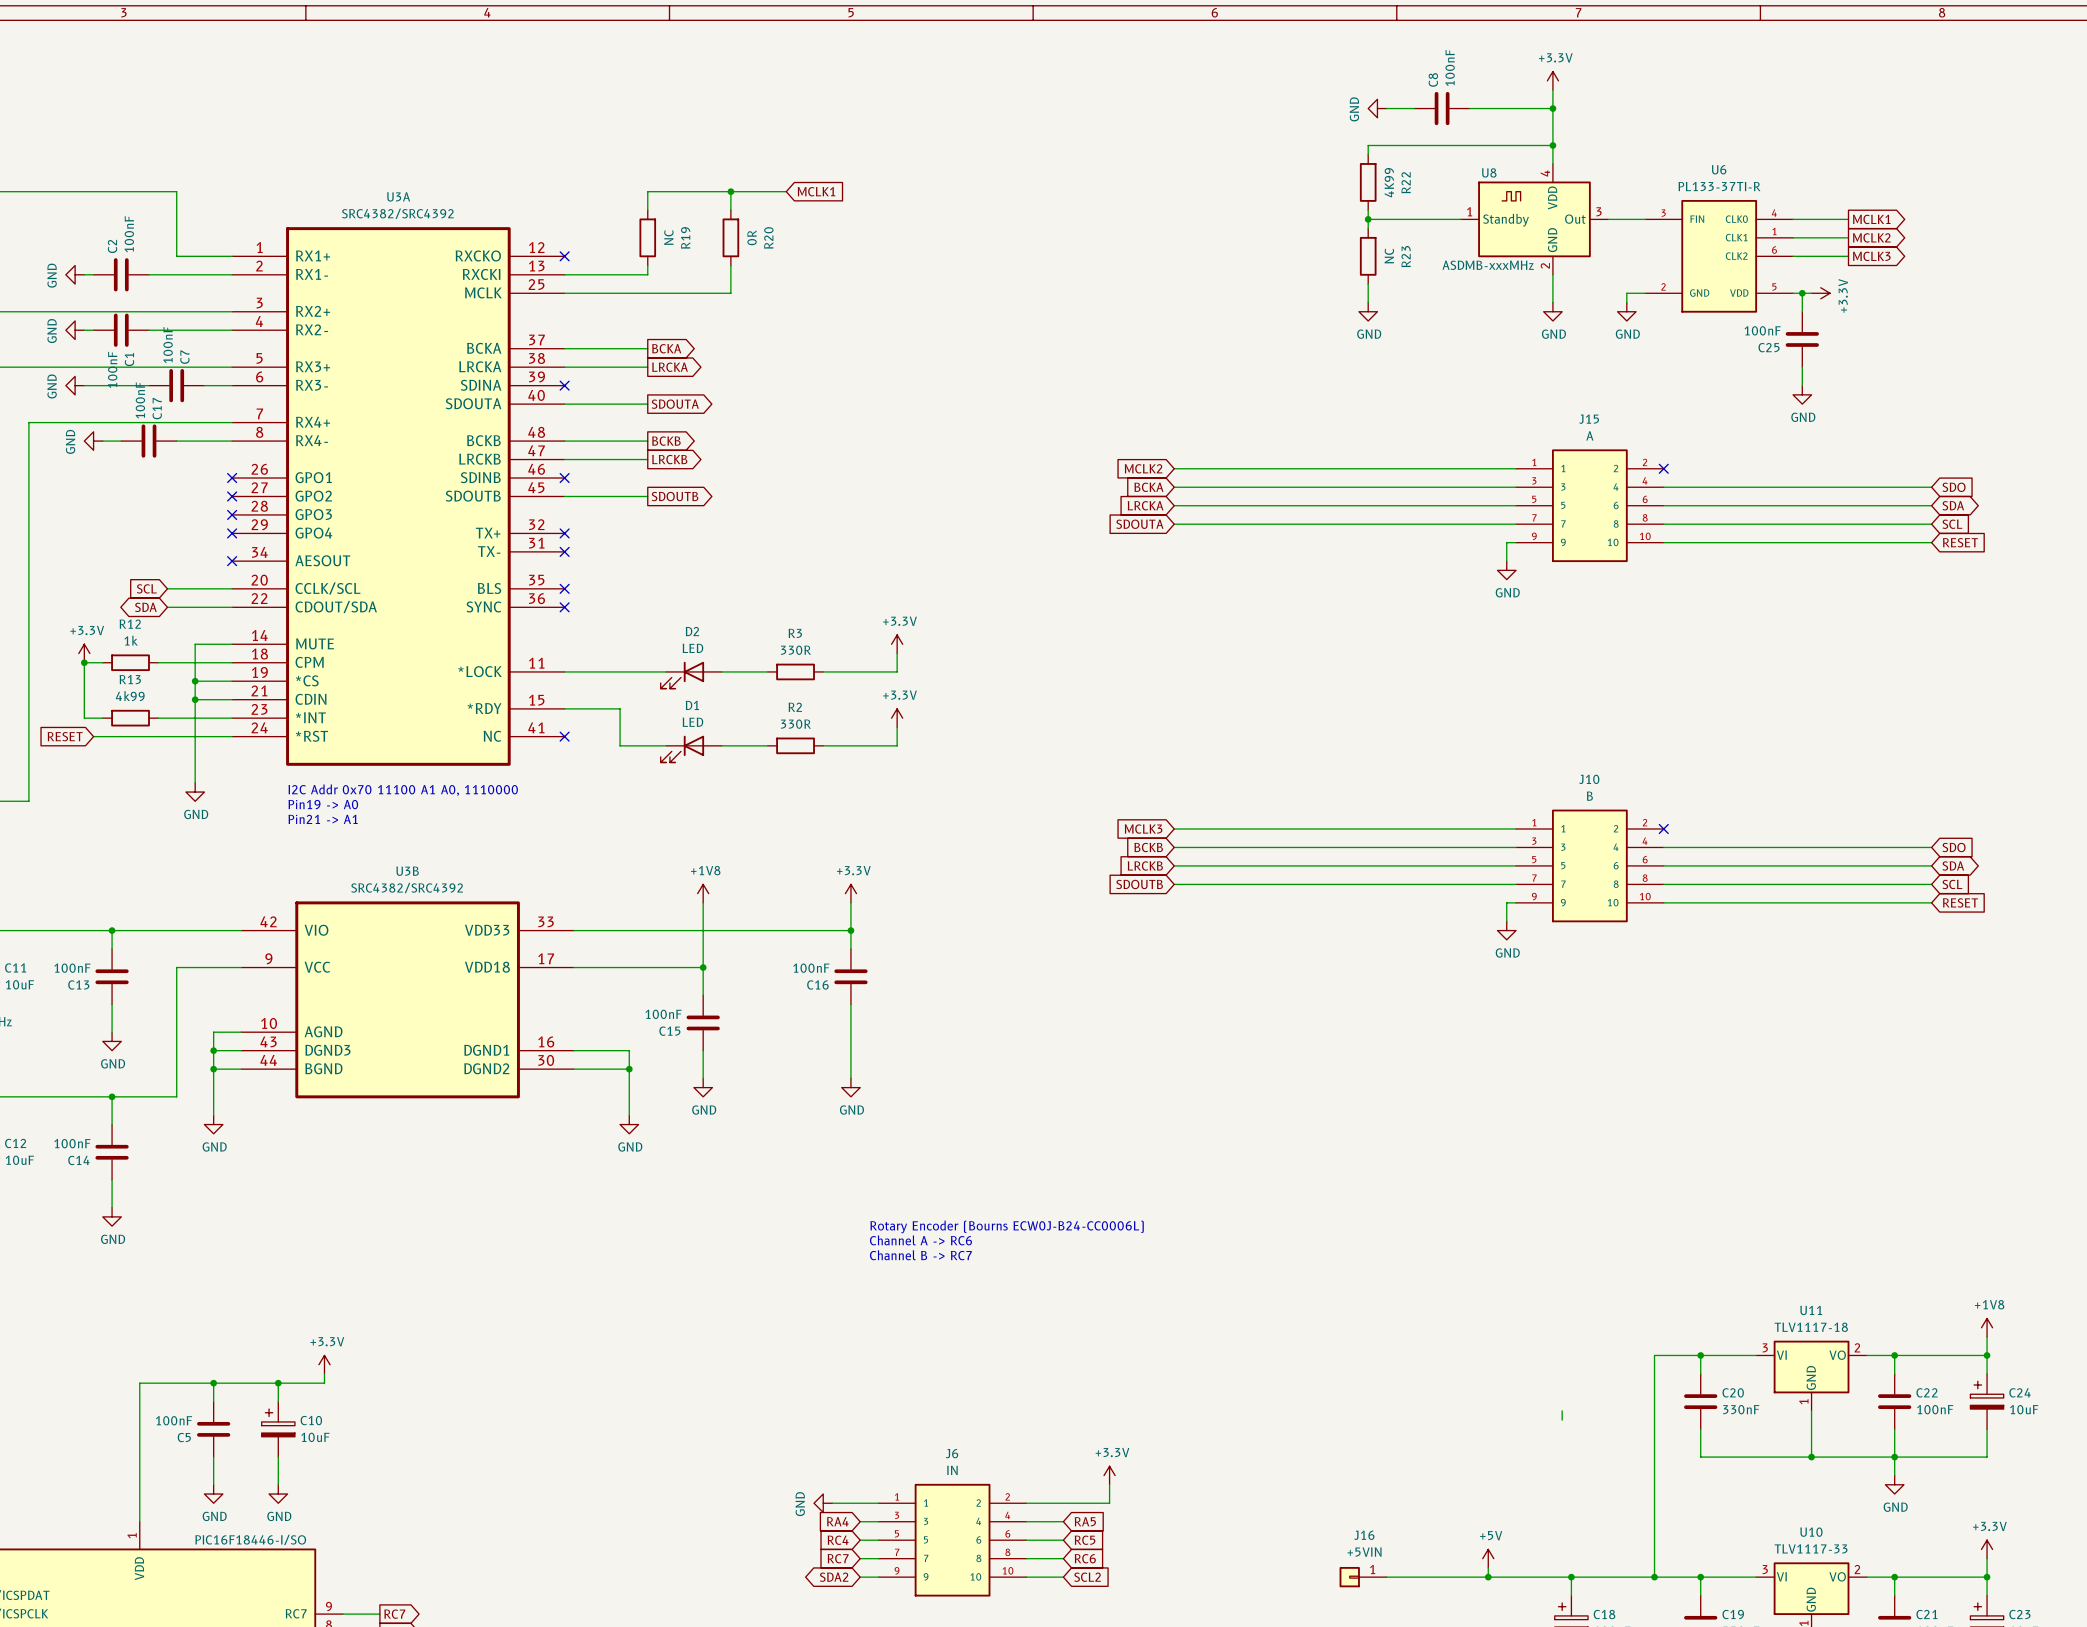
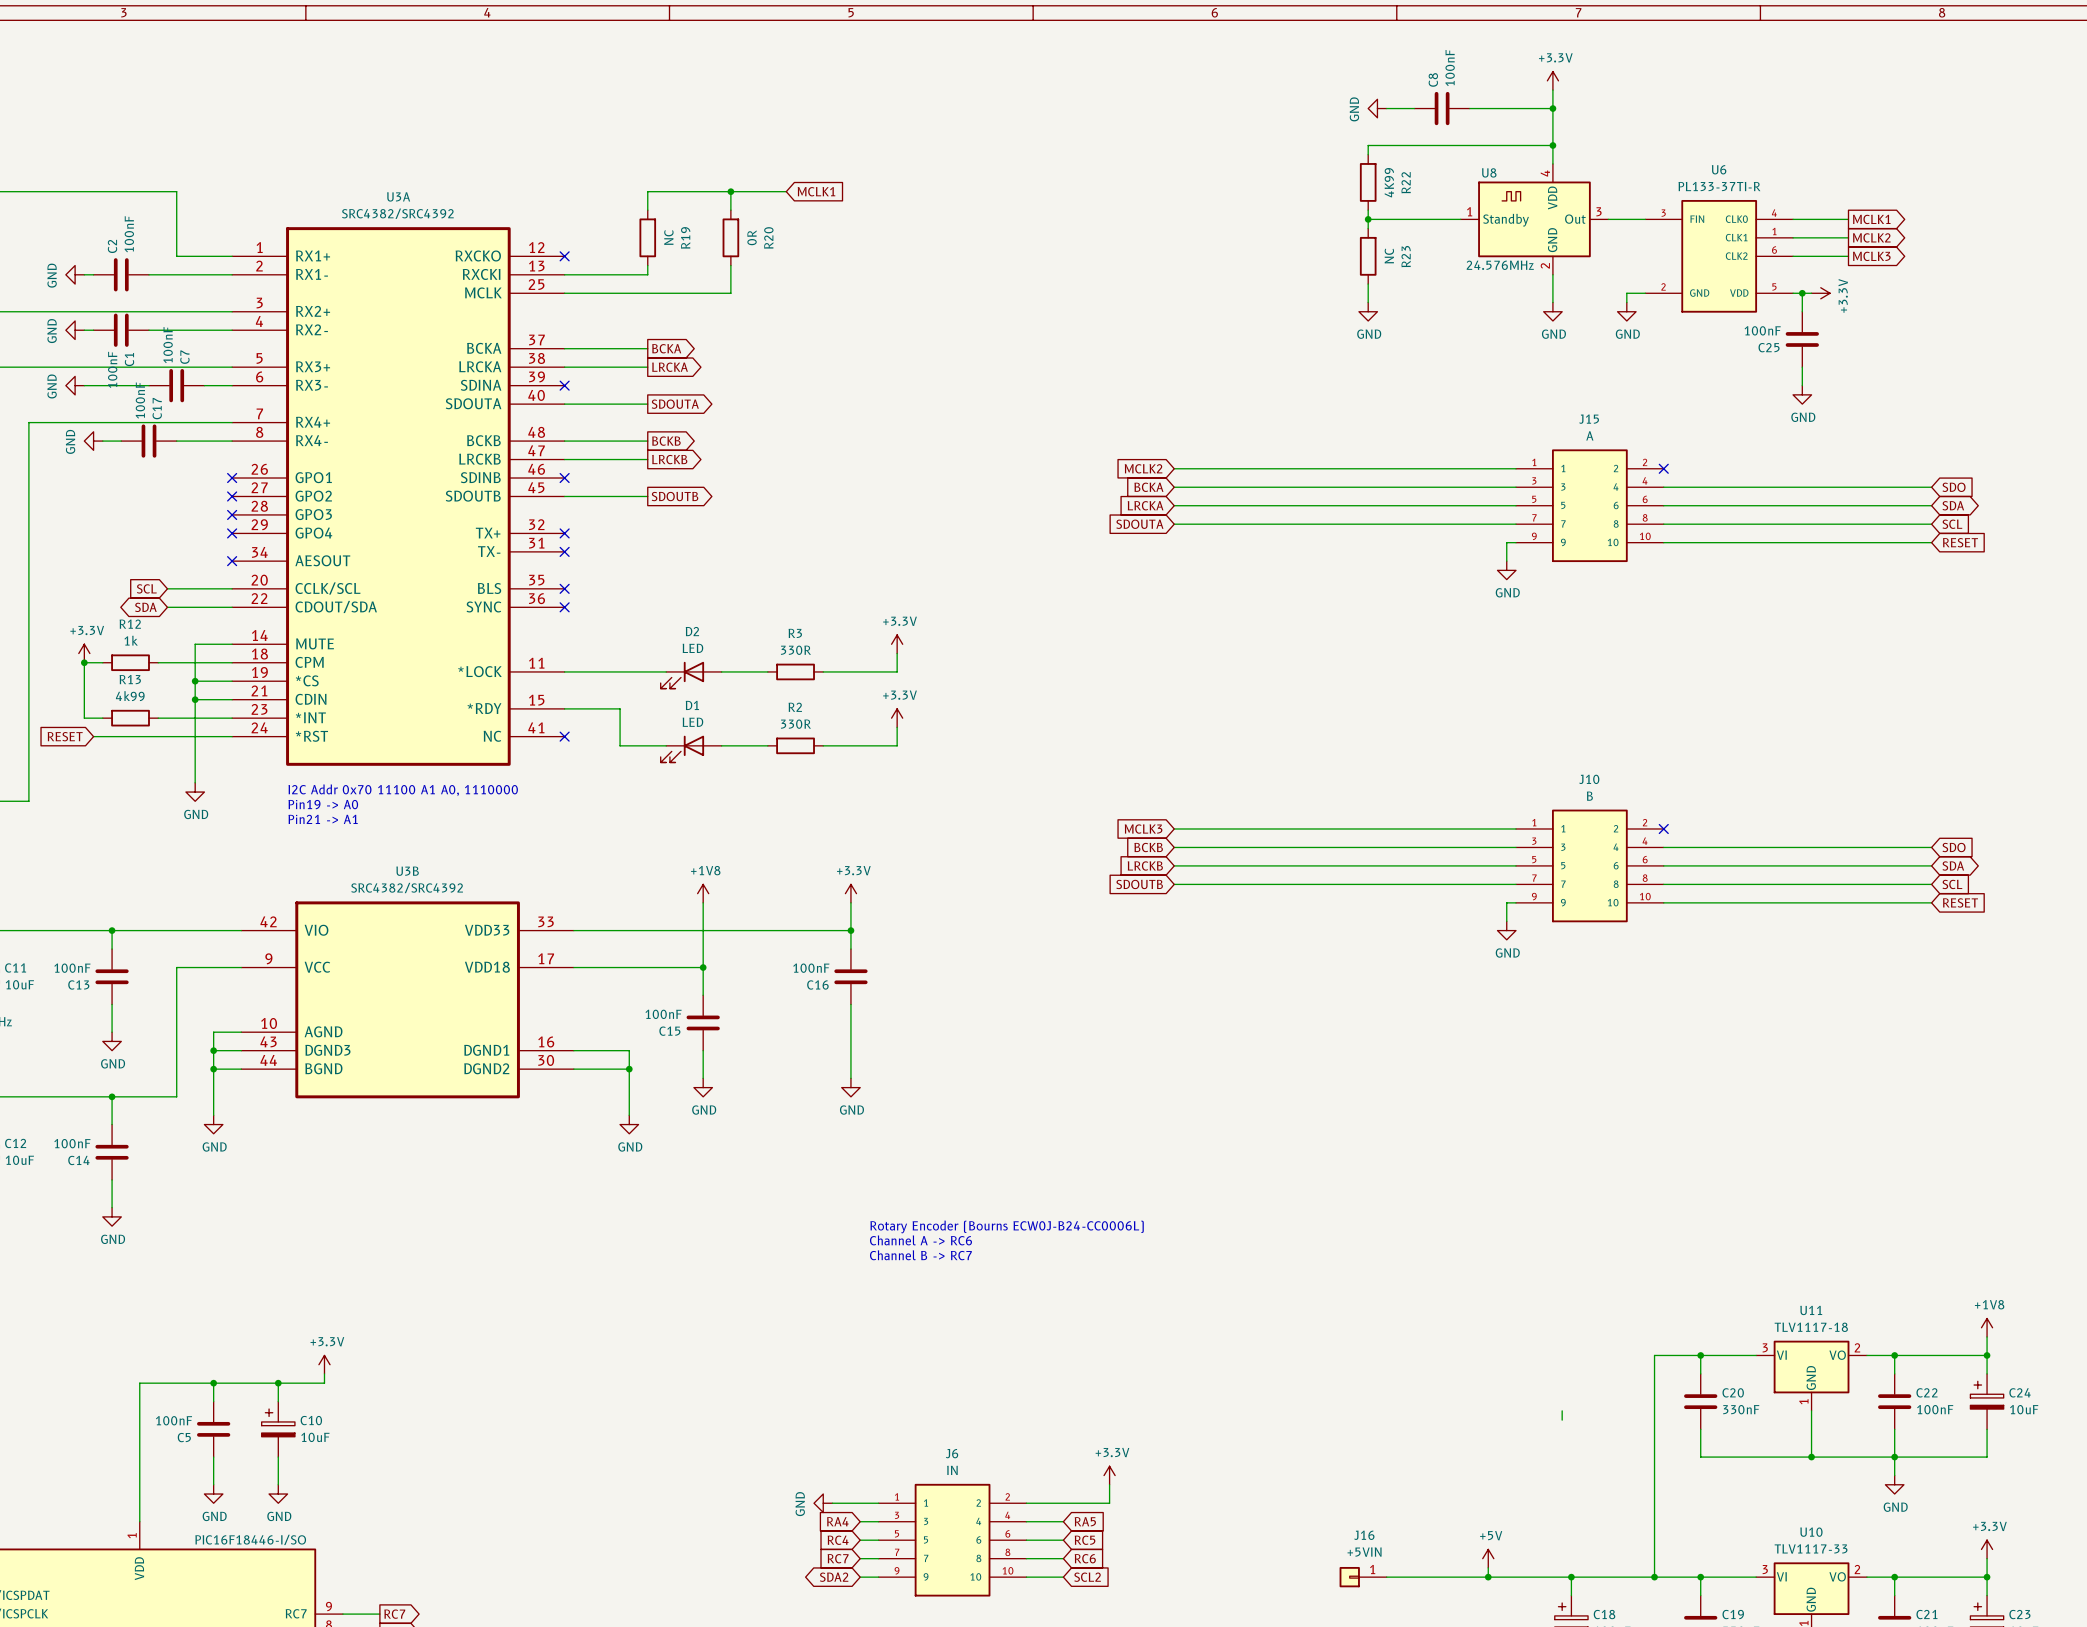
U8 value: ASDMB-xxxMHz (1488, 265) -> 24.576MHz (1500, 265)

